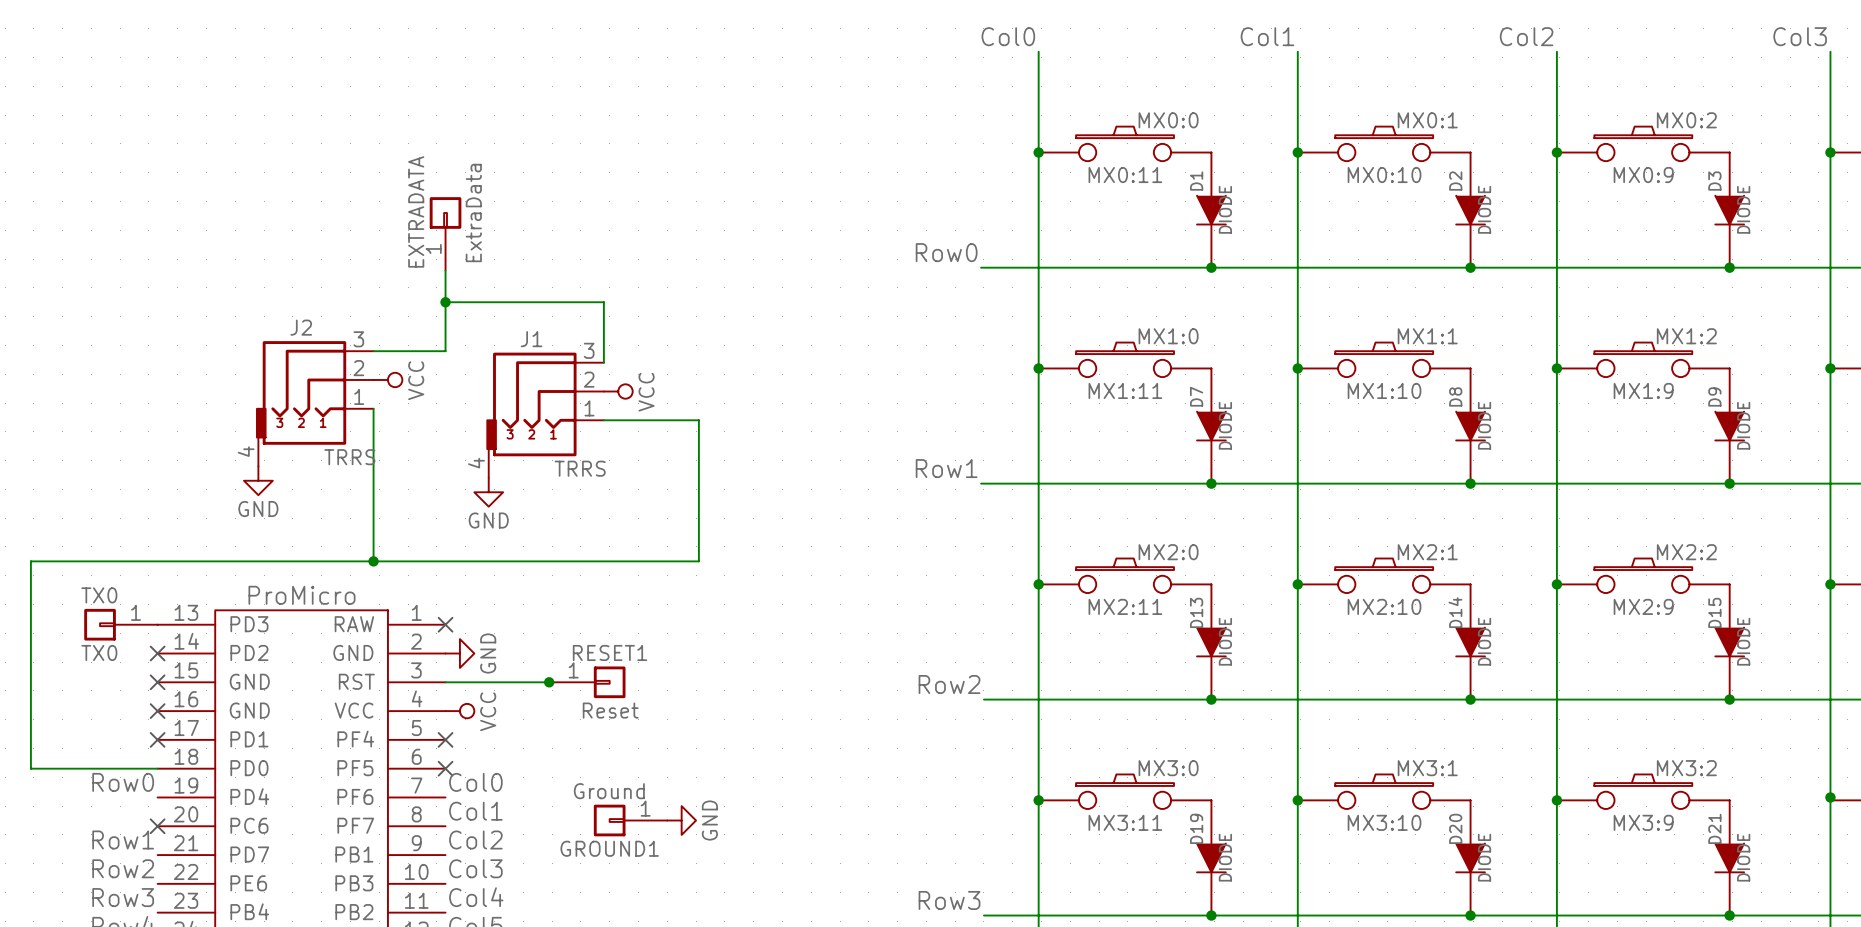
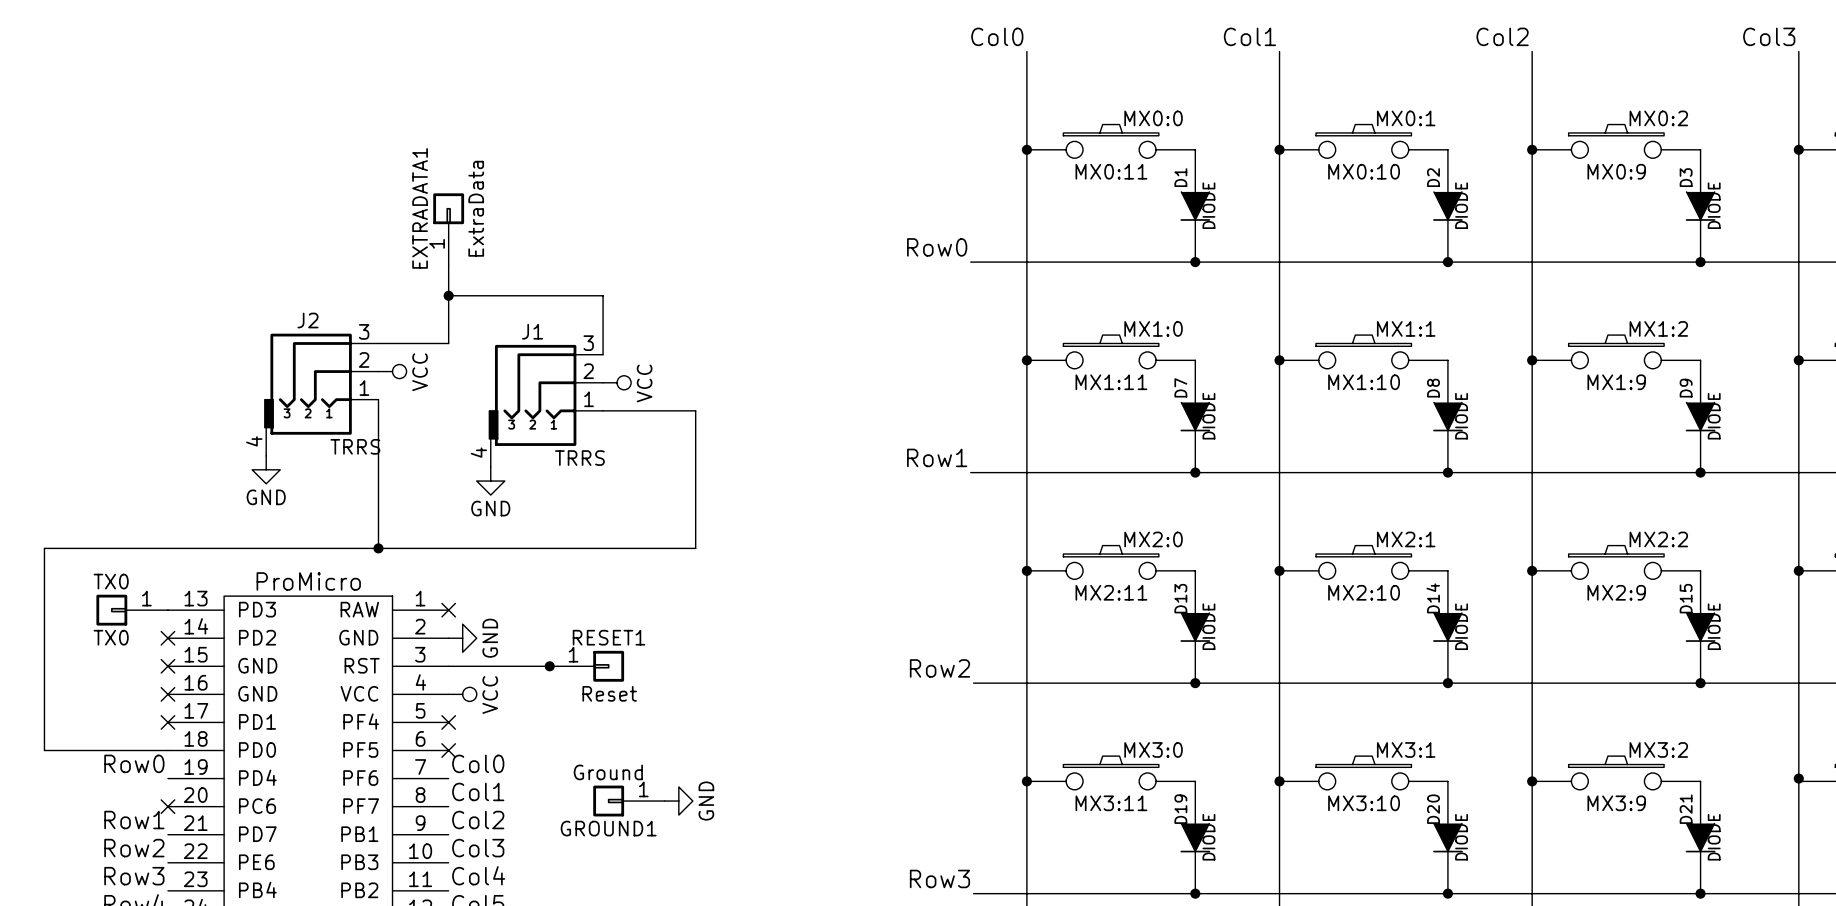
EXTRADATA name: EXTRADATA (416, 211) -> EXTRADATA1 (420, 208)

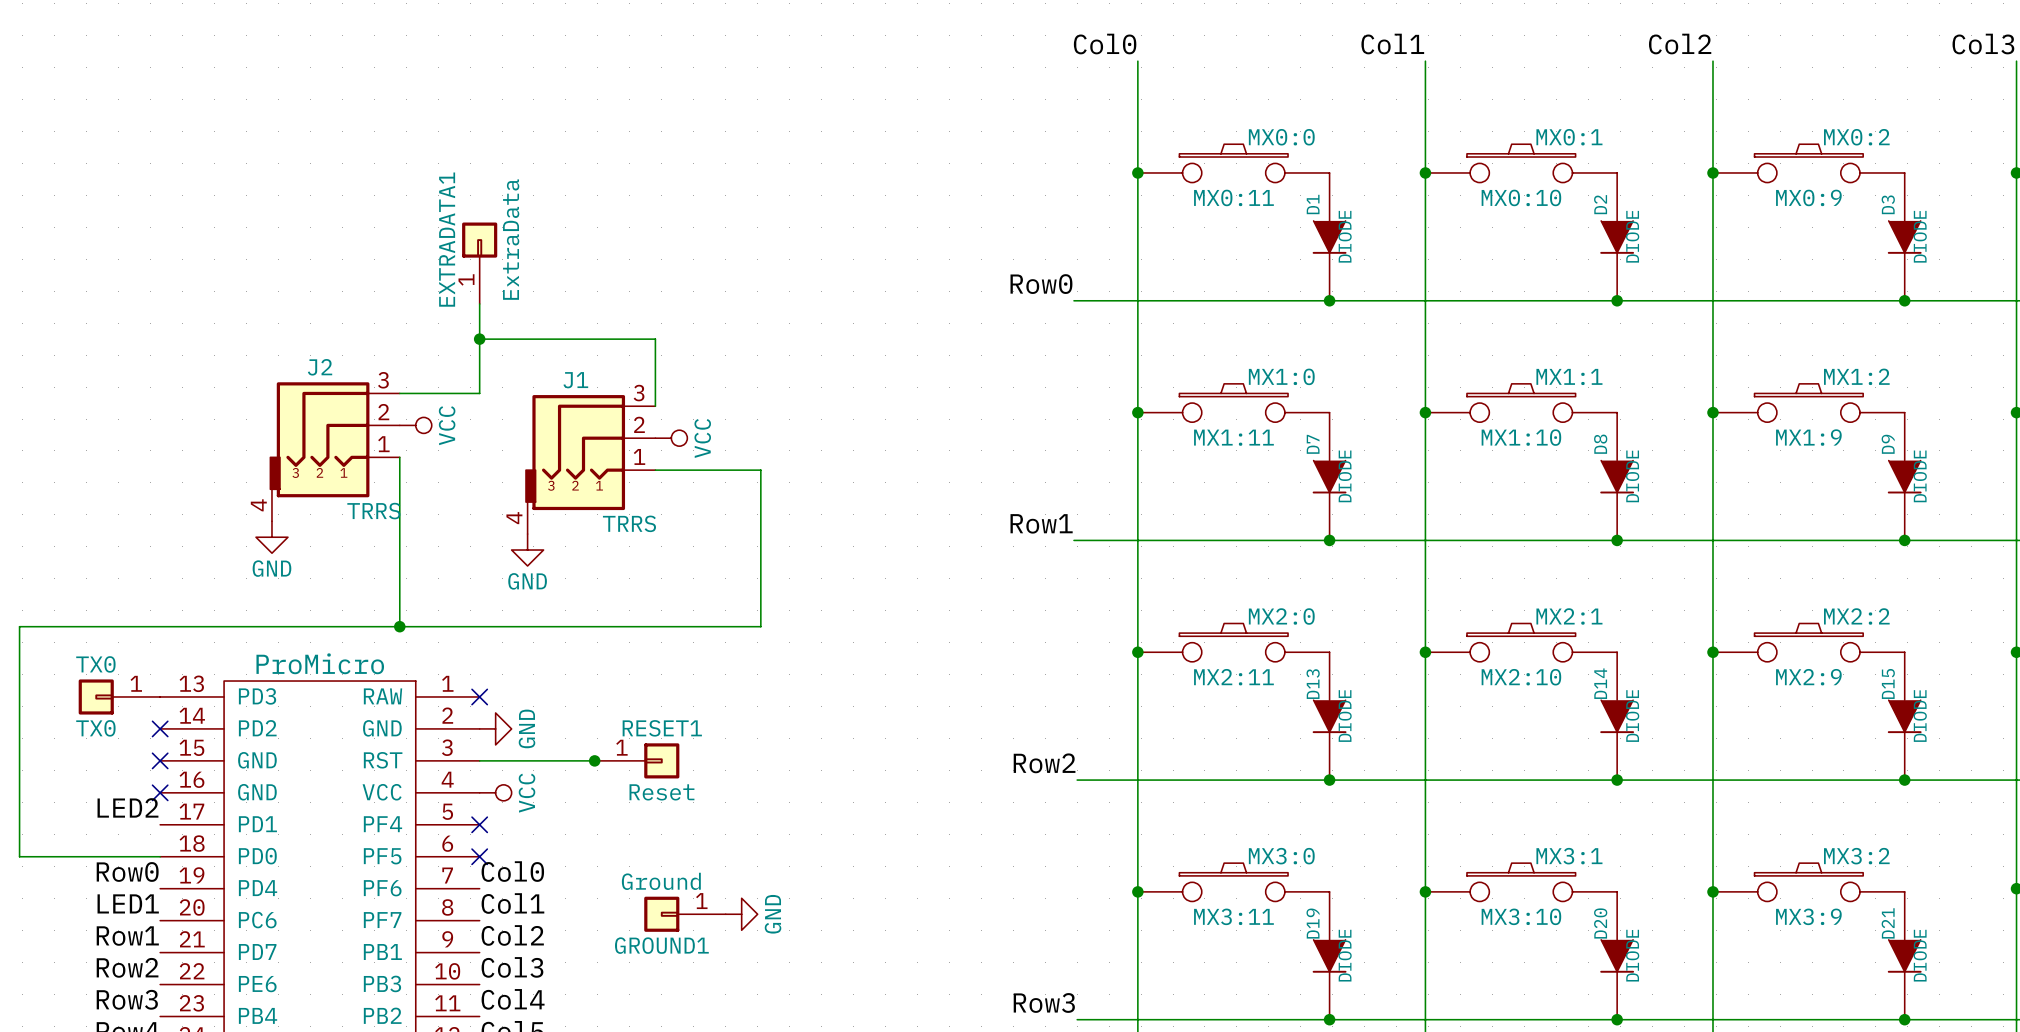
label: none -> LED2 (127, 807)
no-connect mark: (167, 722) -> none
label: none -> LED1 (128, 903)
no-connect mark: (167, 806) -> none

